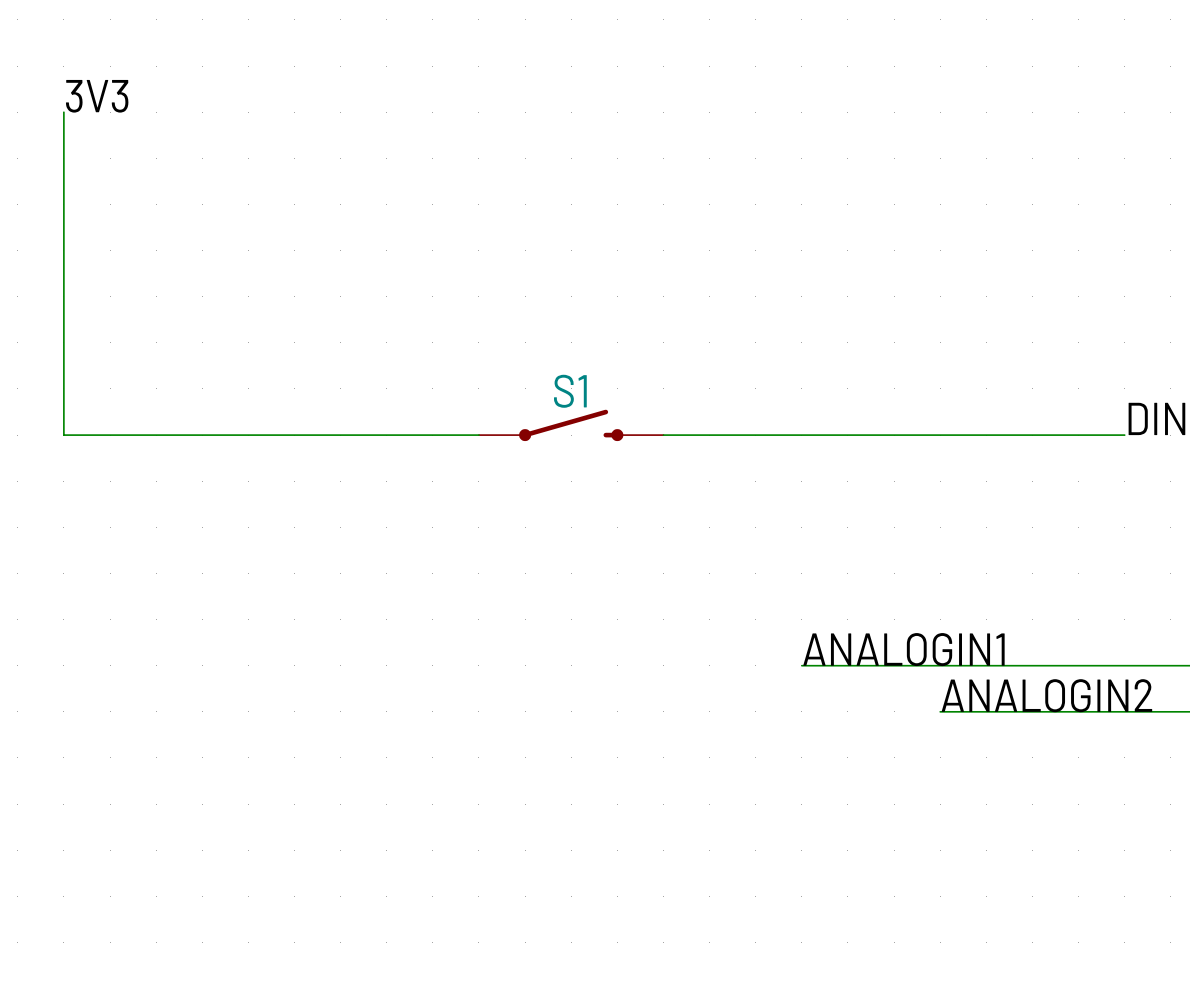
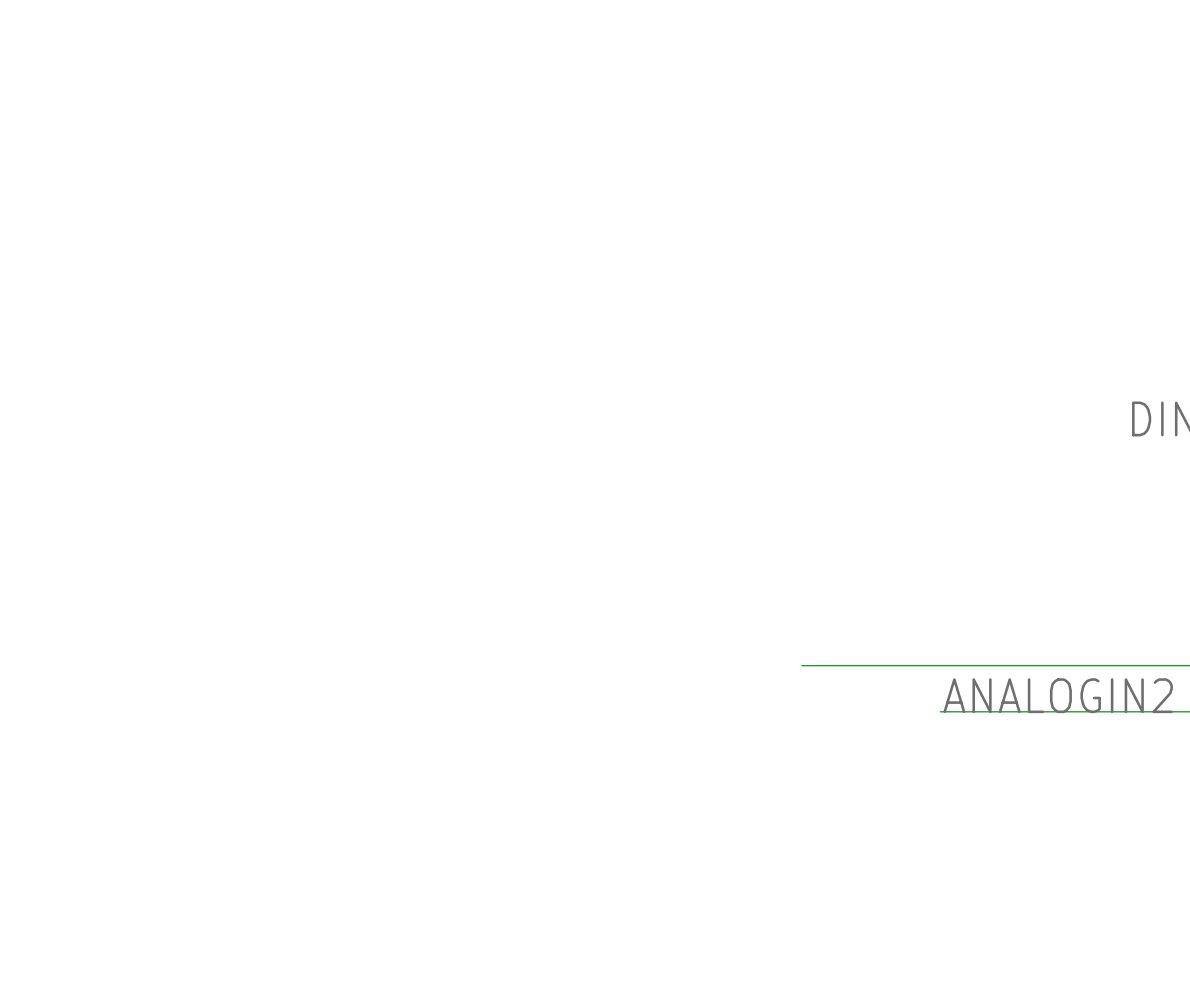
label: 3V3 (97, 96) -> none
wire: (63, 112) (63, 435) (478, 435) -> none
S1: (571, 425) -> none
wire: (663, 435) (1124, 435) -> none
label: ANALOGIN1 (903, 649) -> none

